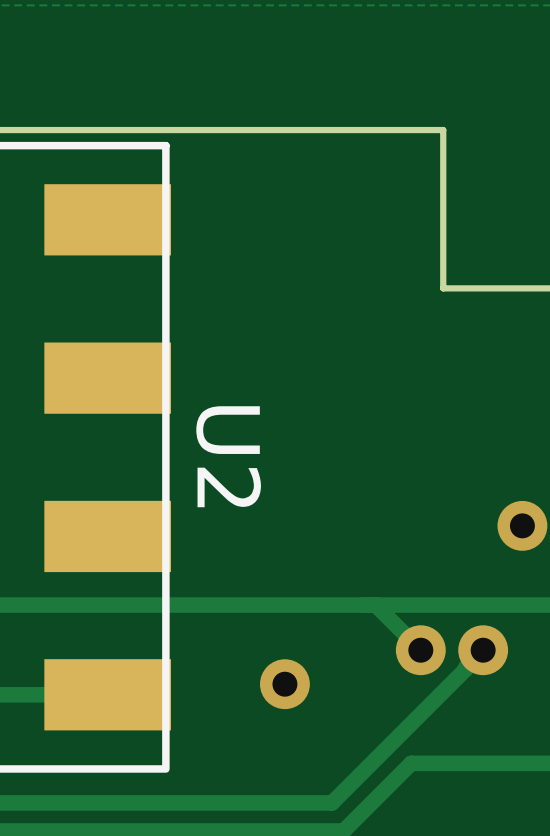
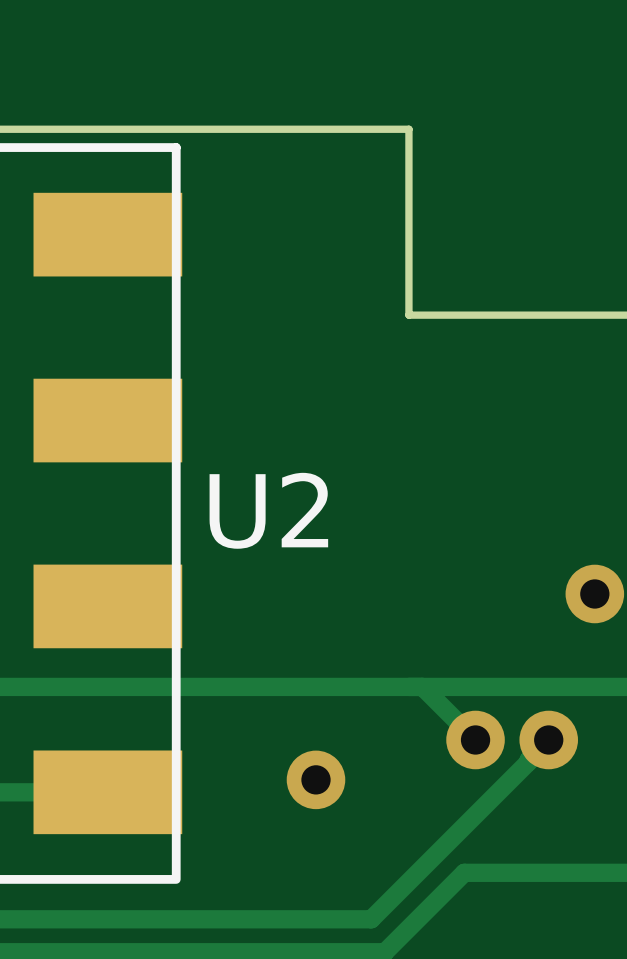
board edge: (364, 130) (443, 130) (443, 288) -> (408, 129) (408, 315) (501, 315)
U2 name rotation: 0° (228, 456) -> 90° counterclockwise (268, 510)

